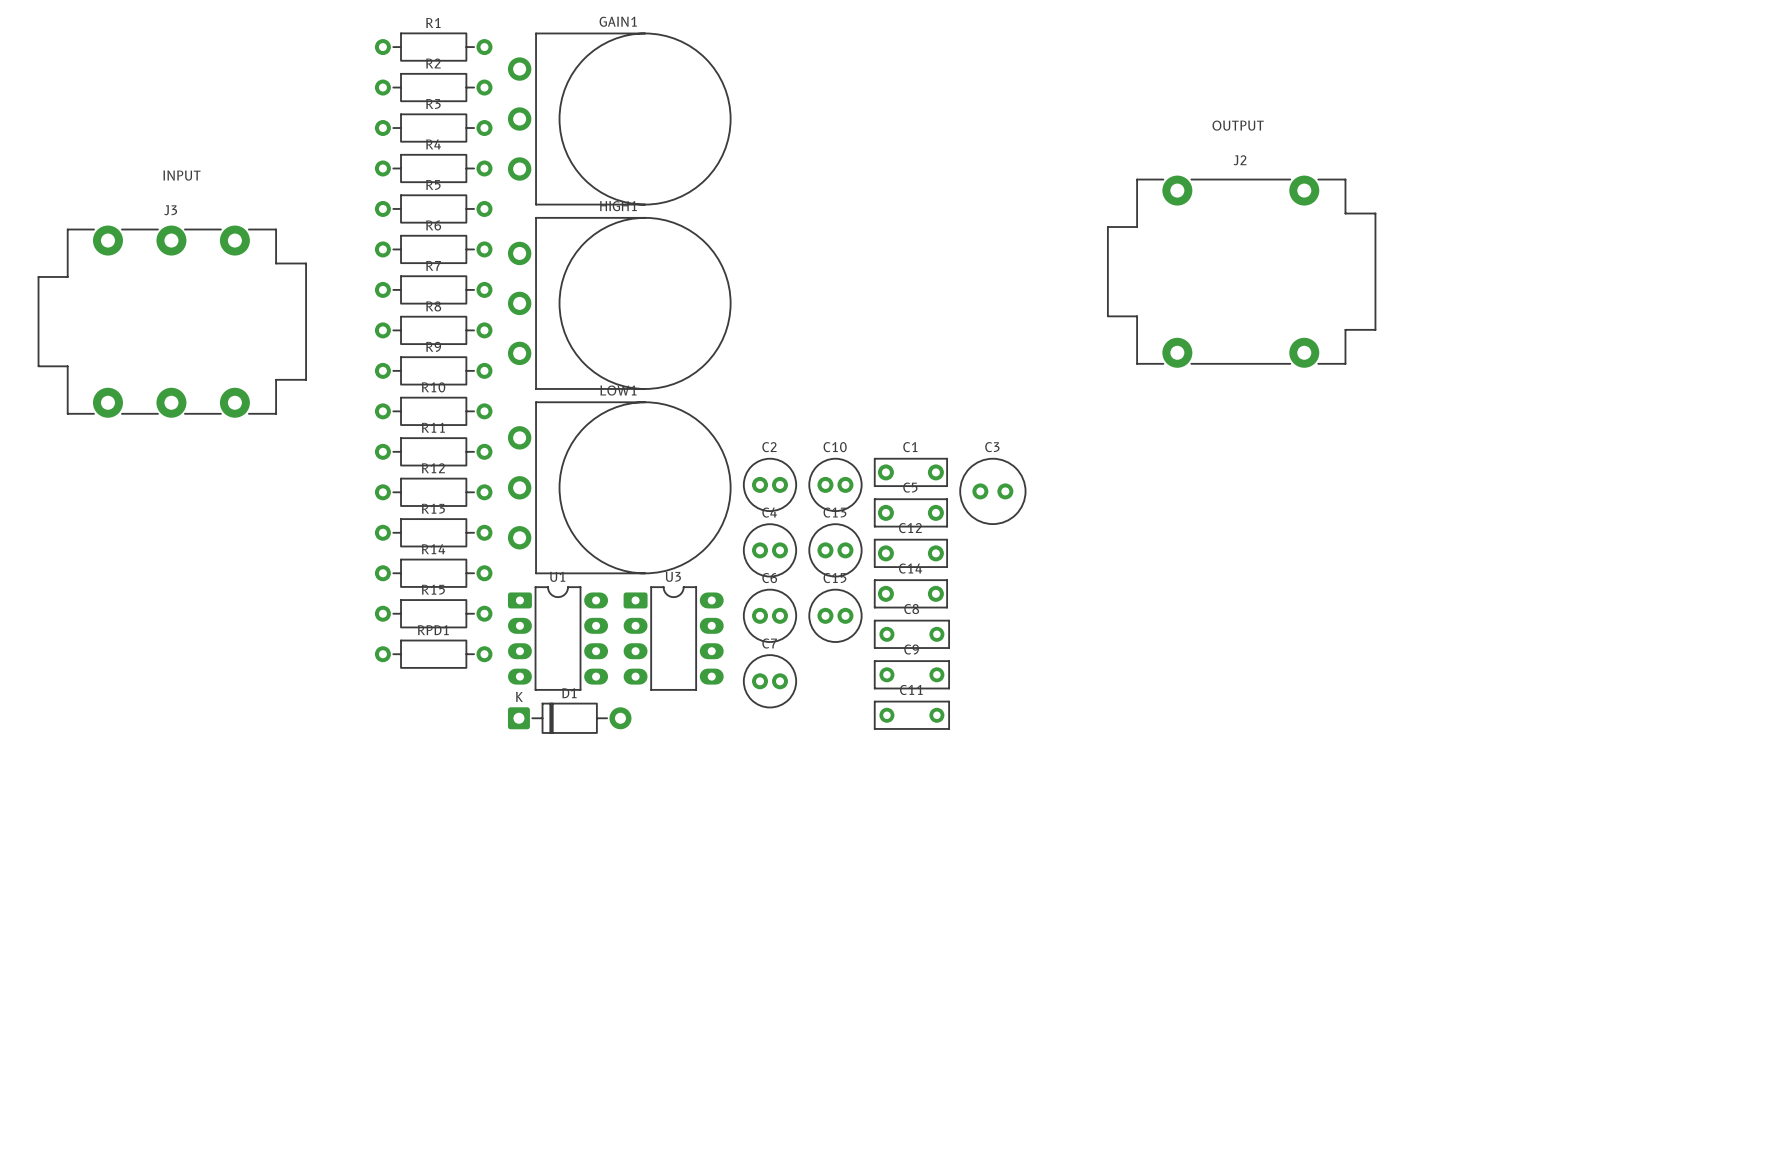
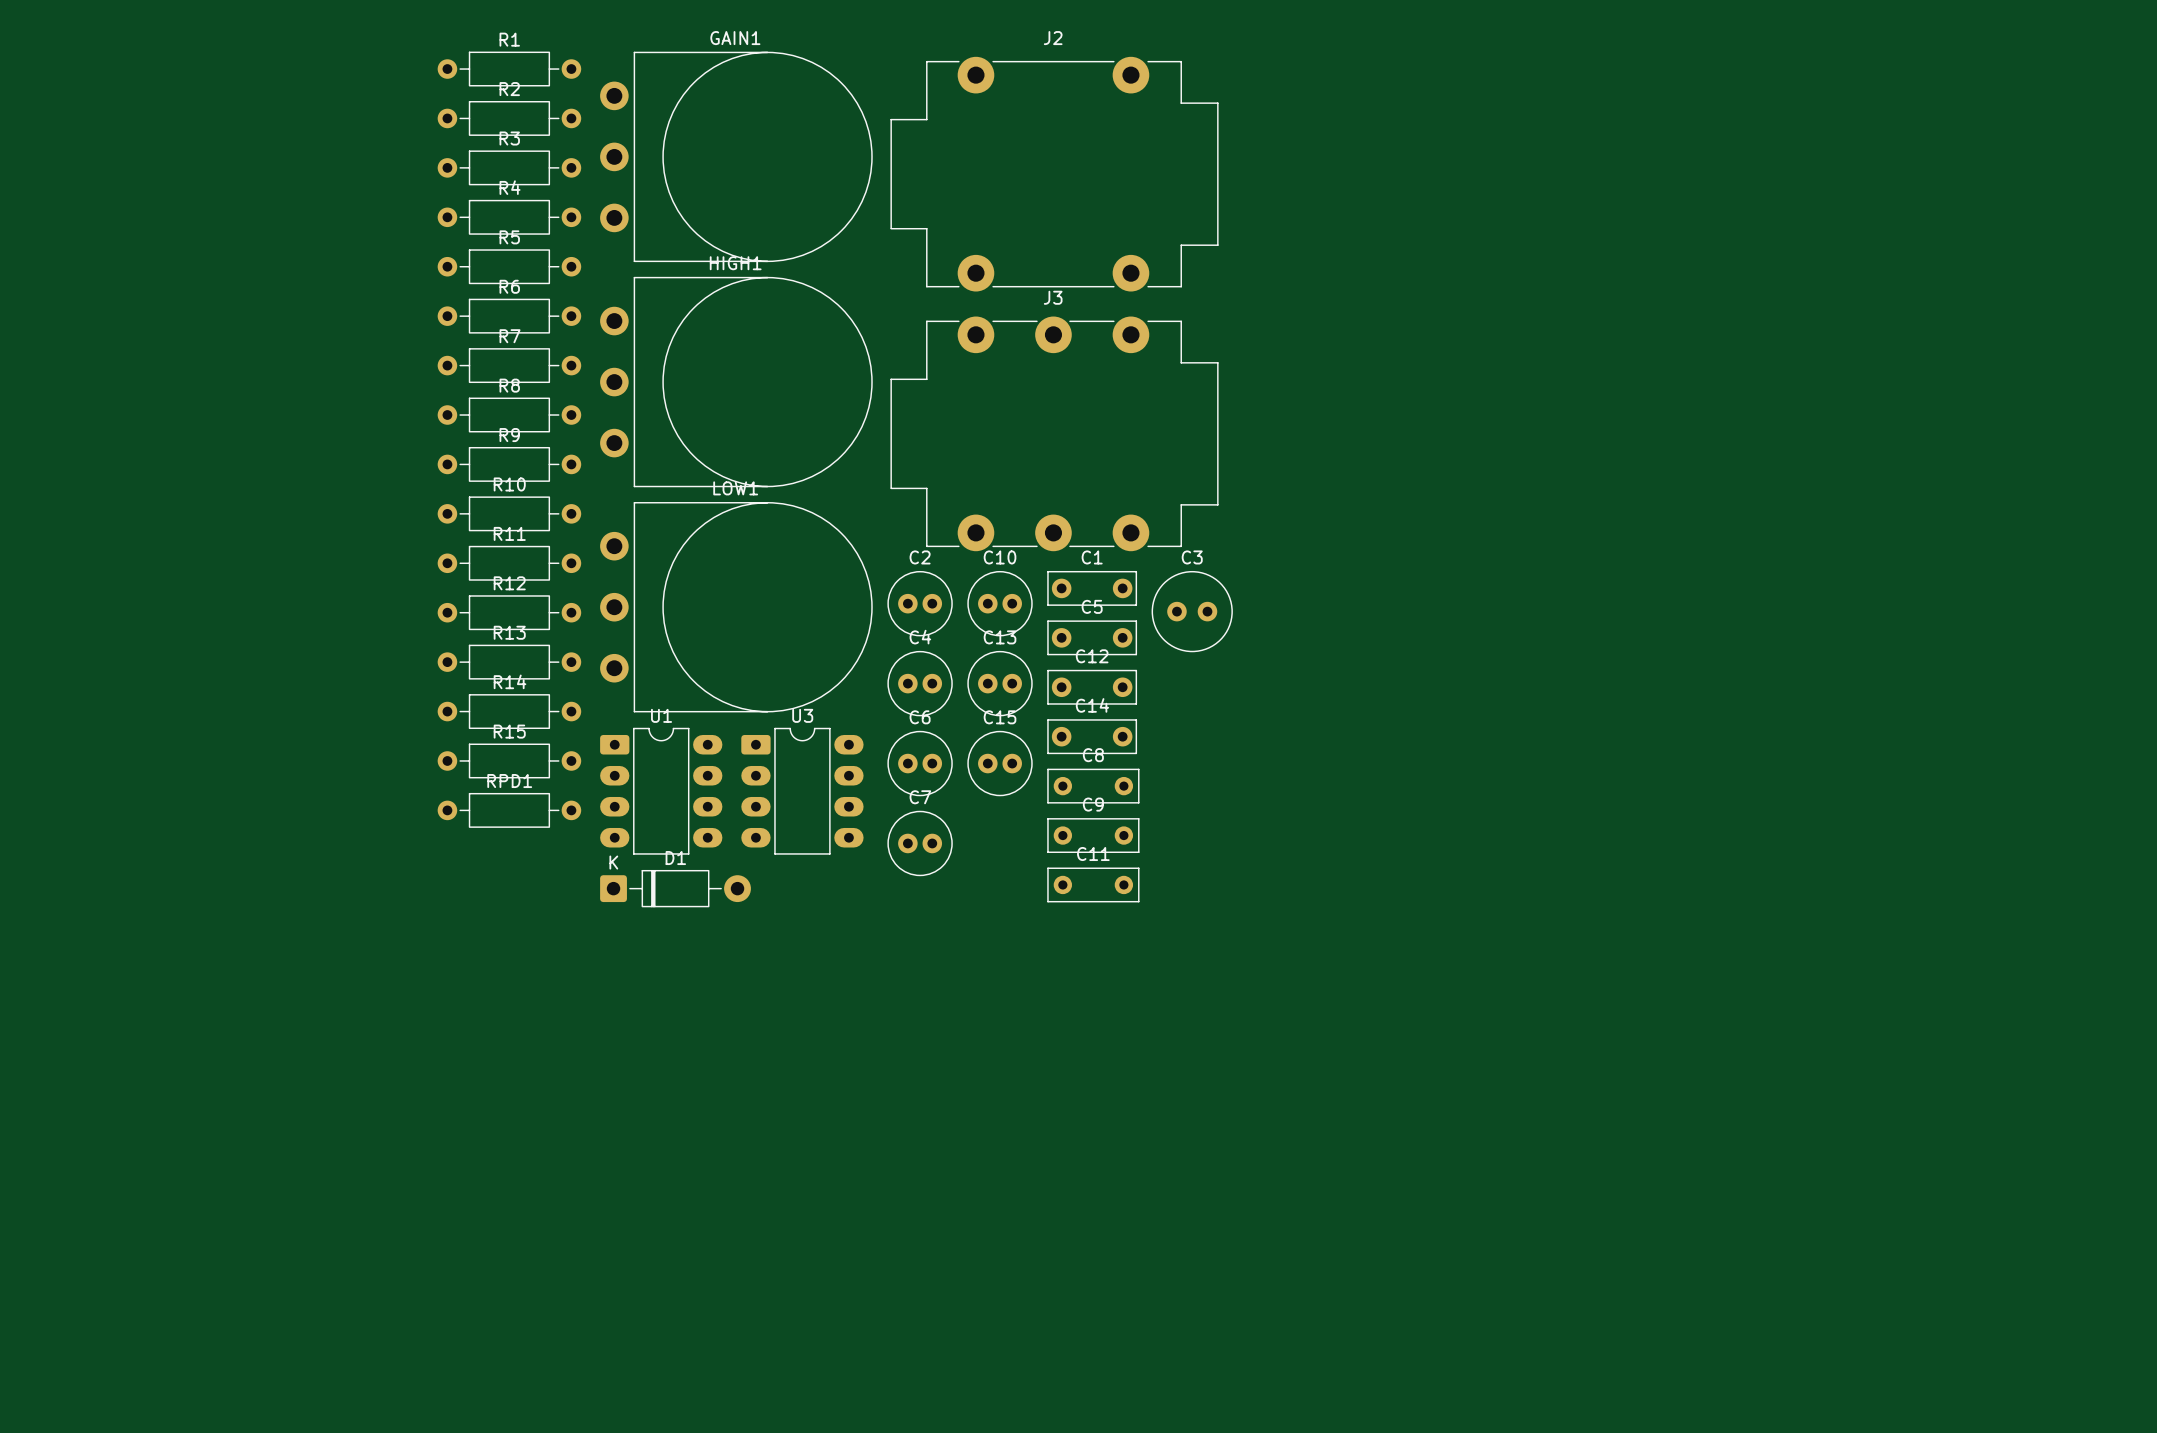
text: OUTPUT (1238, 125) -> none
text: INPUT (181, 175) -> none
J2 position: (1241, 271) -> (1054, 174)
J3 position: (172, 321) -> (1054, 433)

